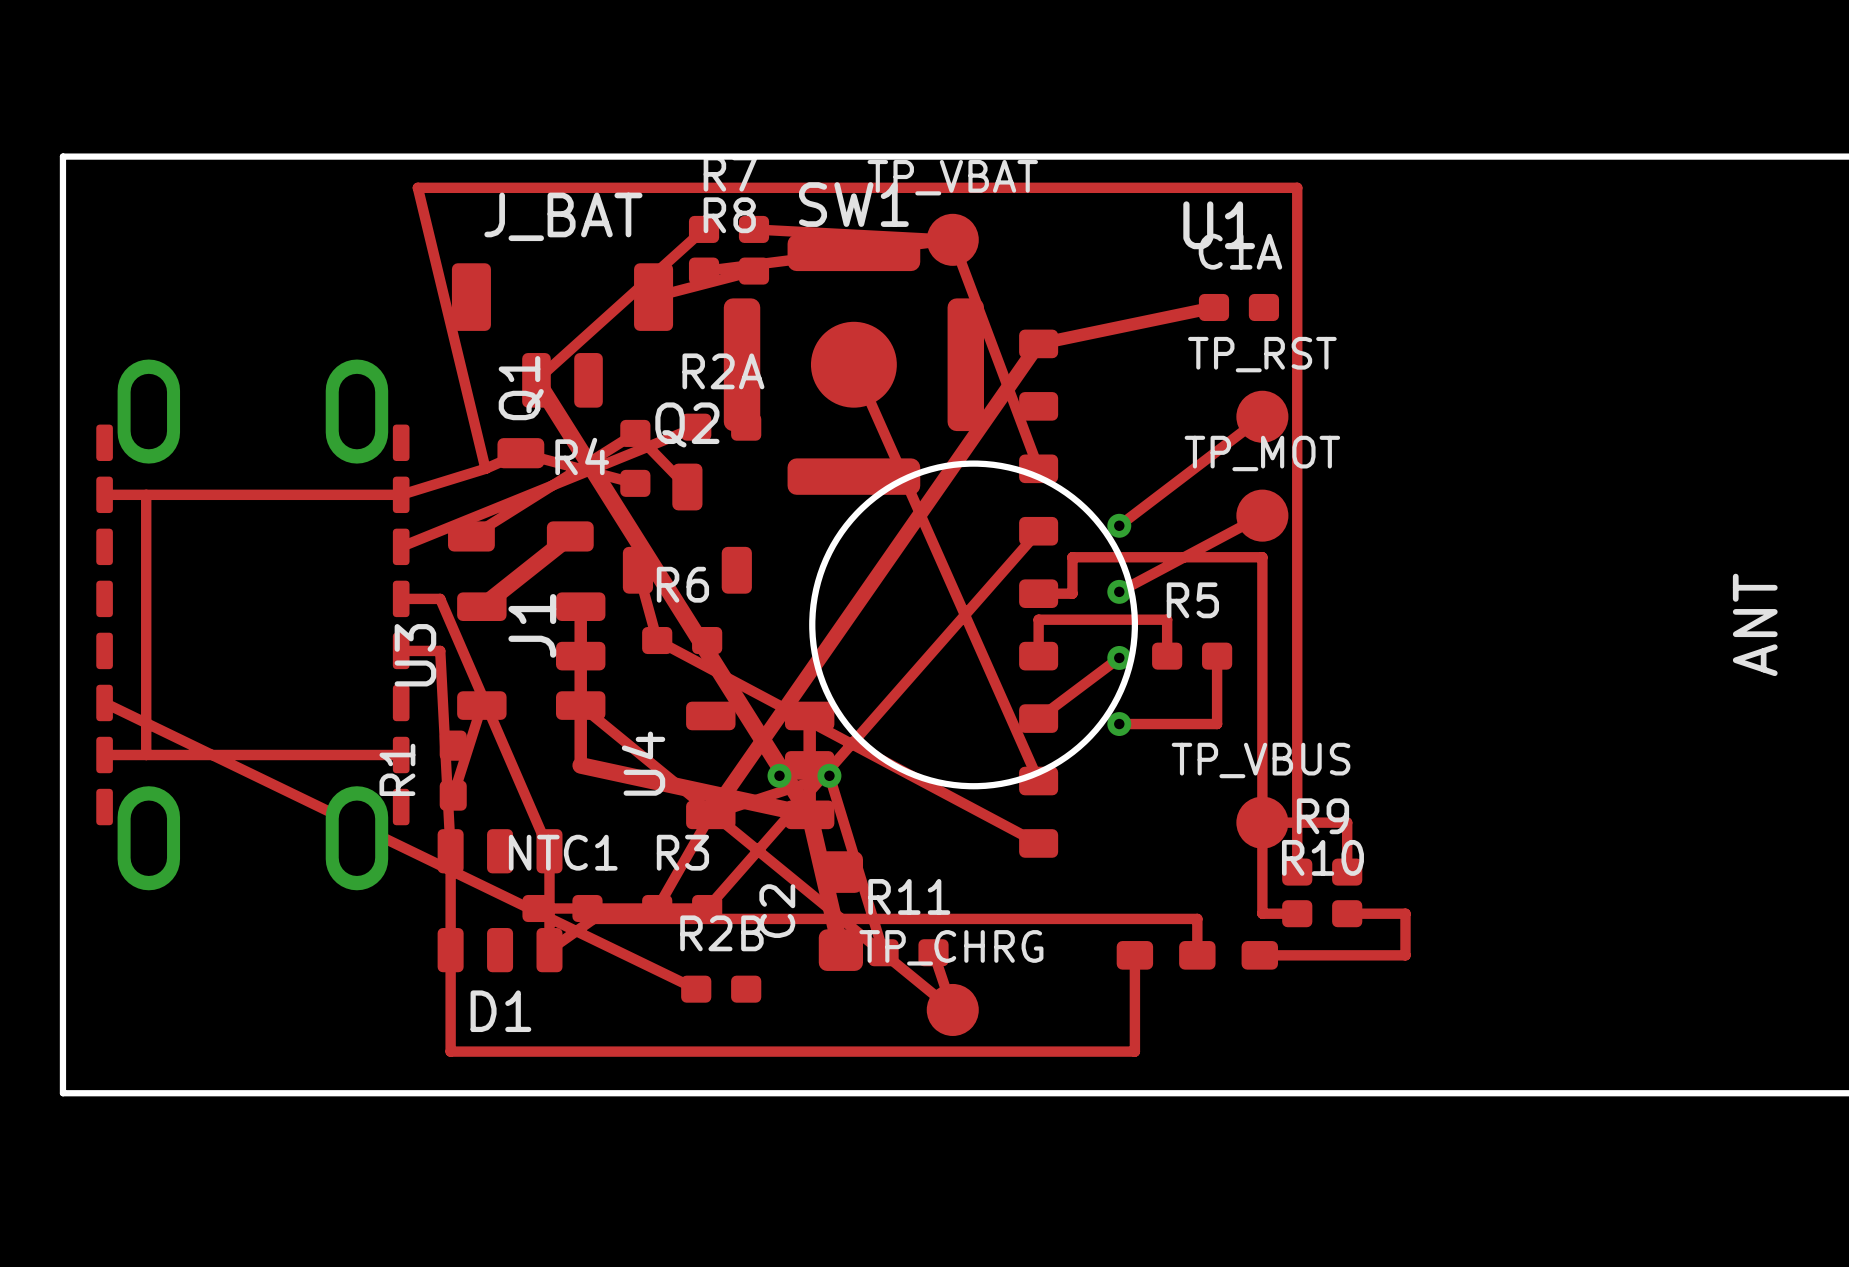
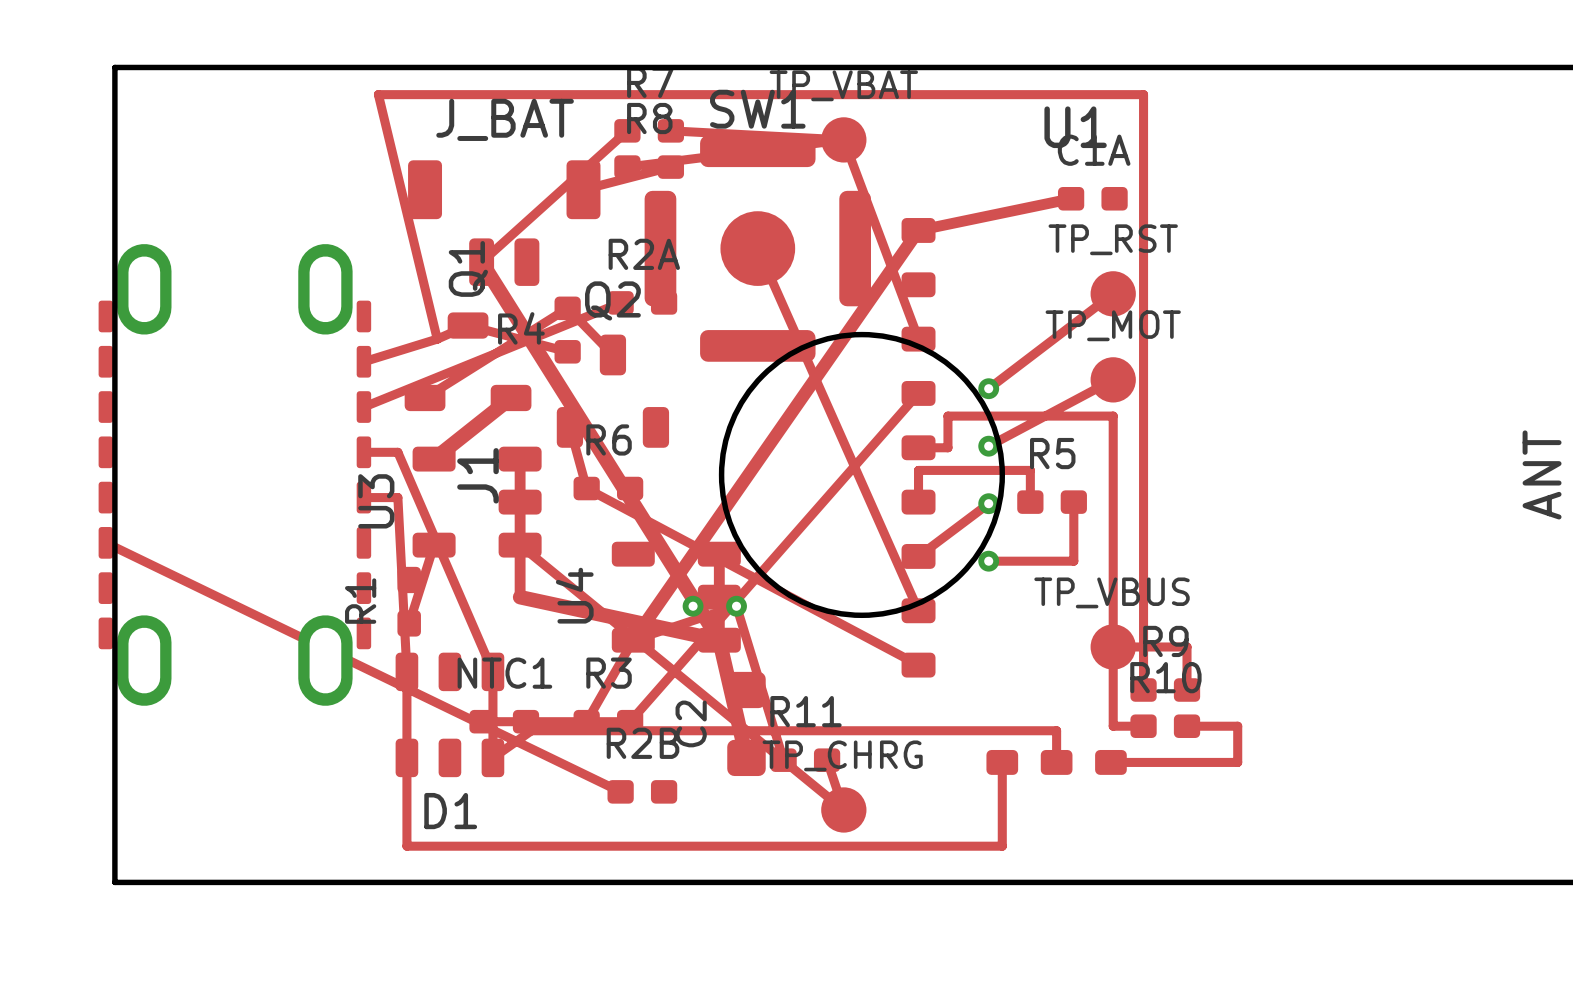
board edge: (114, 156) (62, 156) (62, 1093) (114, 1093) -> (114, 67) (114, 882)
track: (104, 494) (401, 494) -> none
track: (146, 494) (146, 755) -> none
track: (104, 755) (401, 755) -> none

